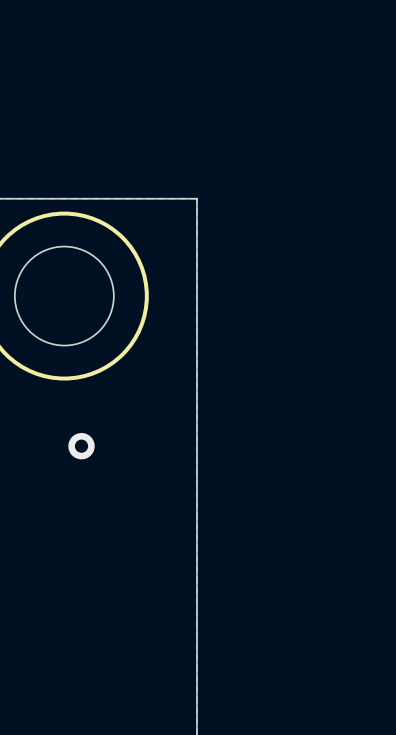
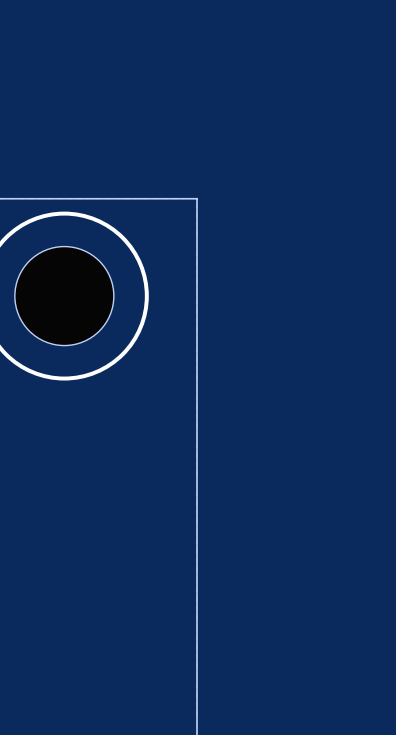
via: (81, 446) -> none

